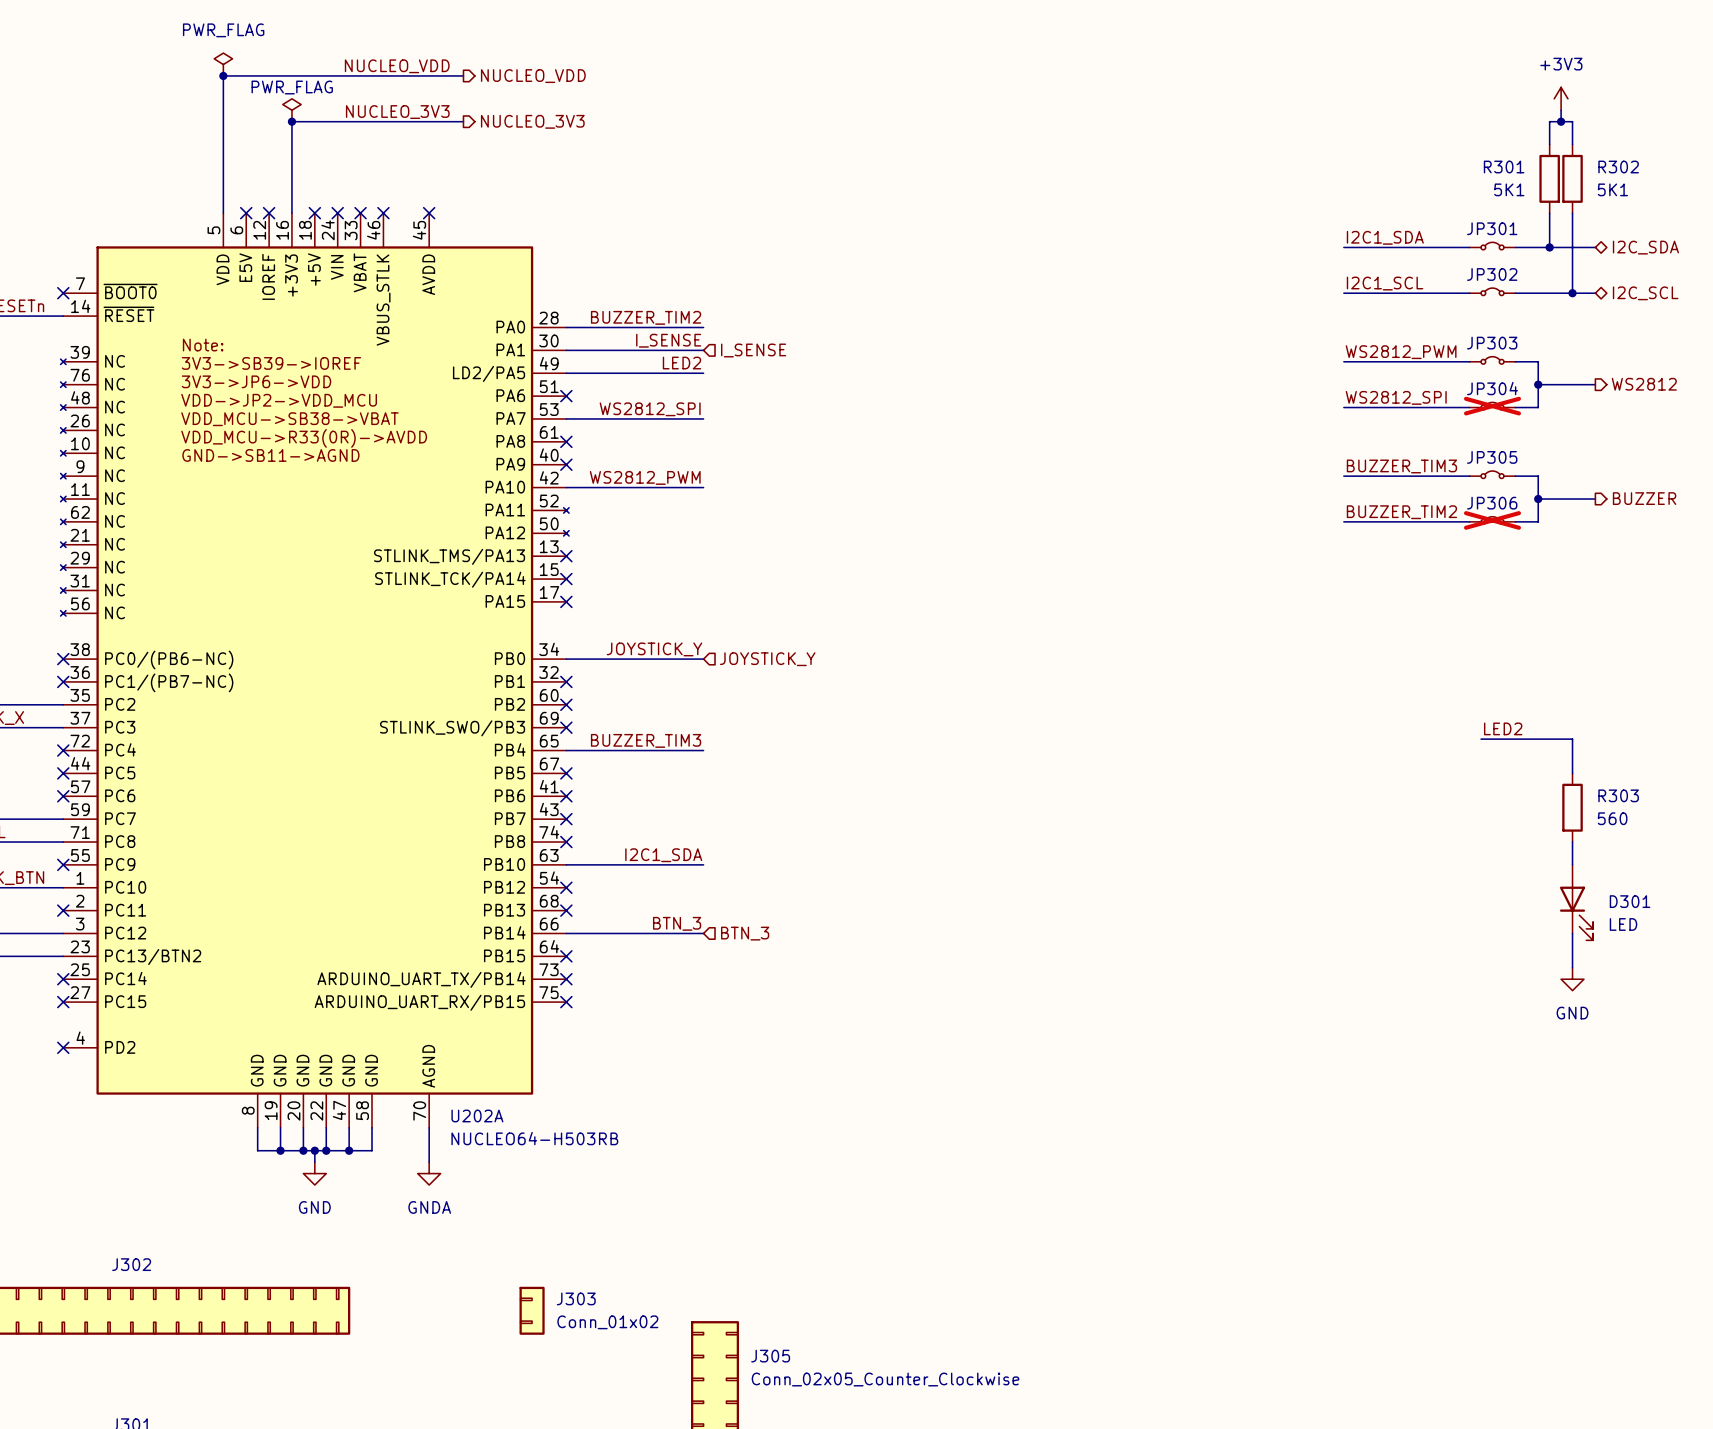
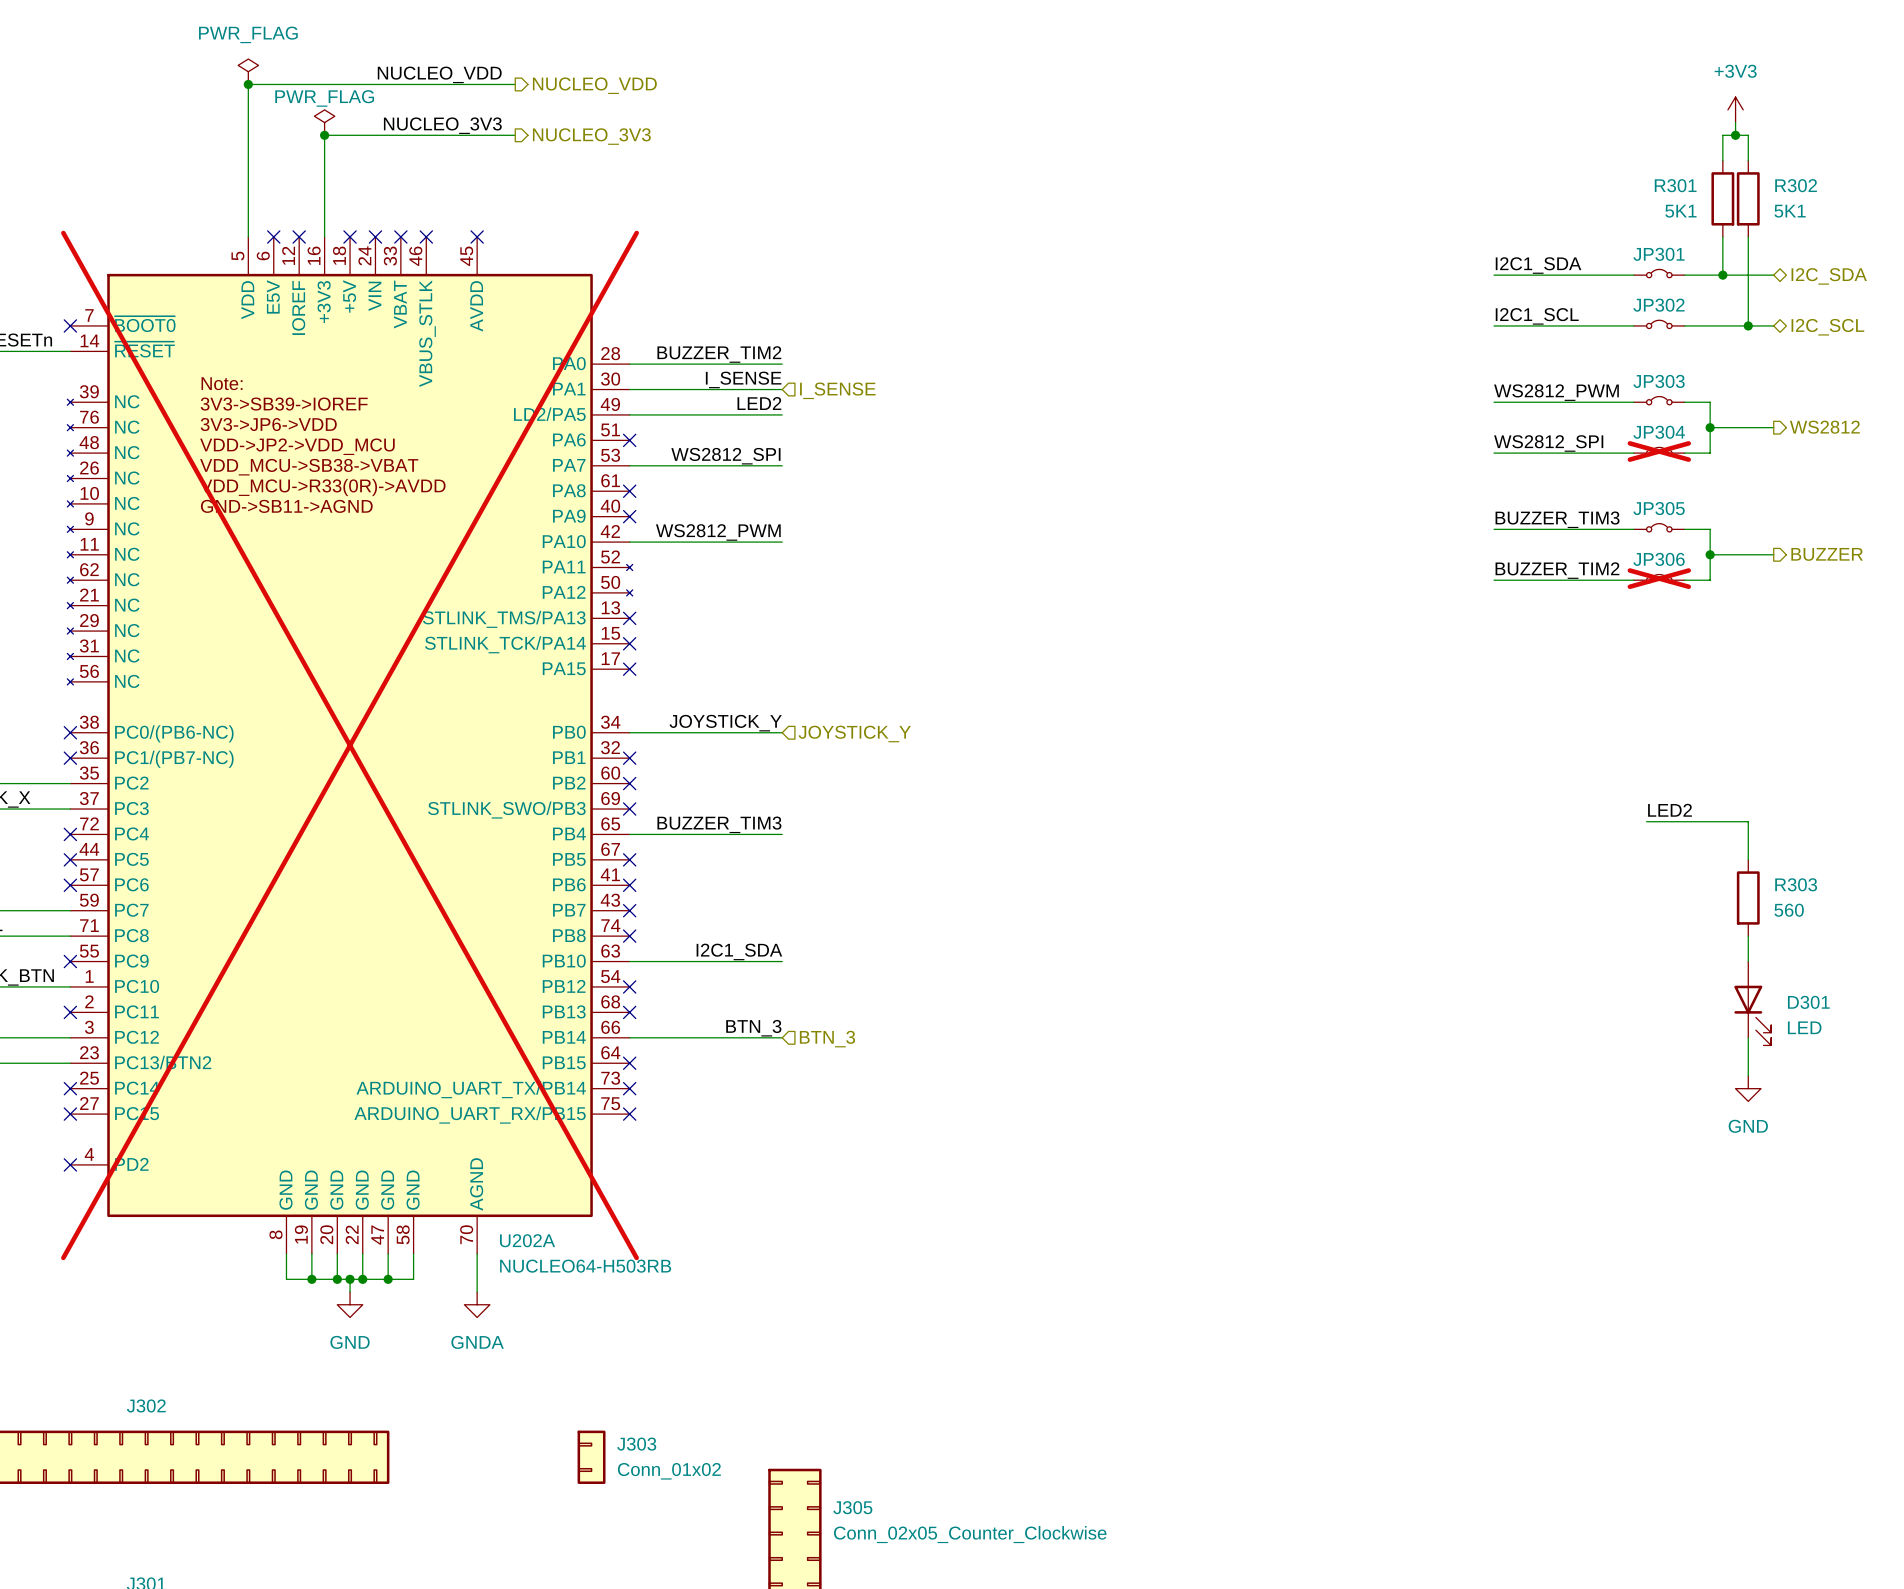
U202A do-not-place cross: none -> (350, 745)

